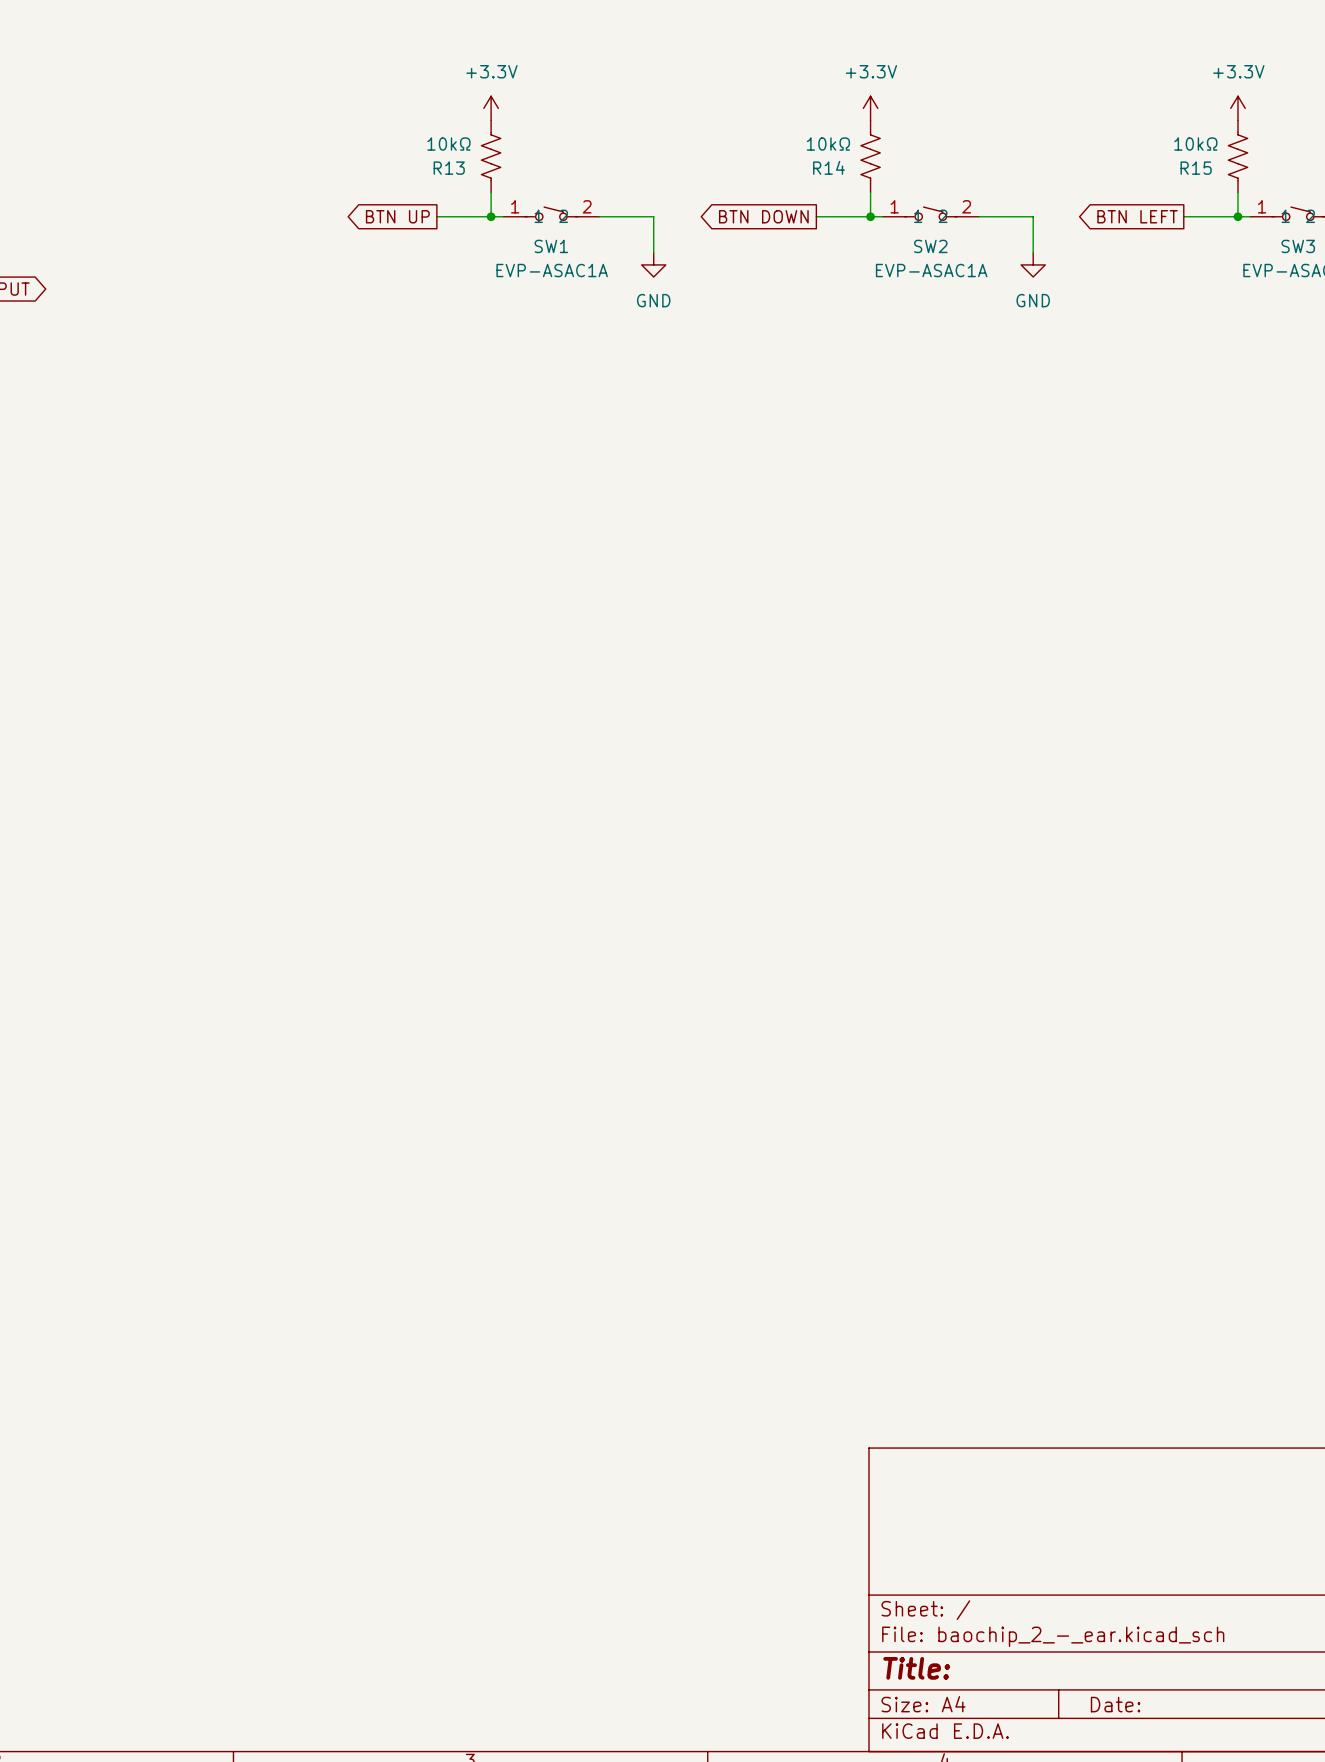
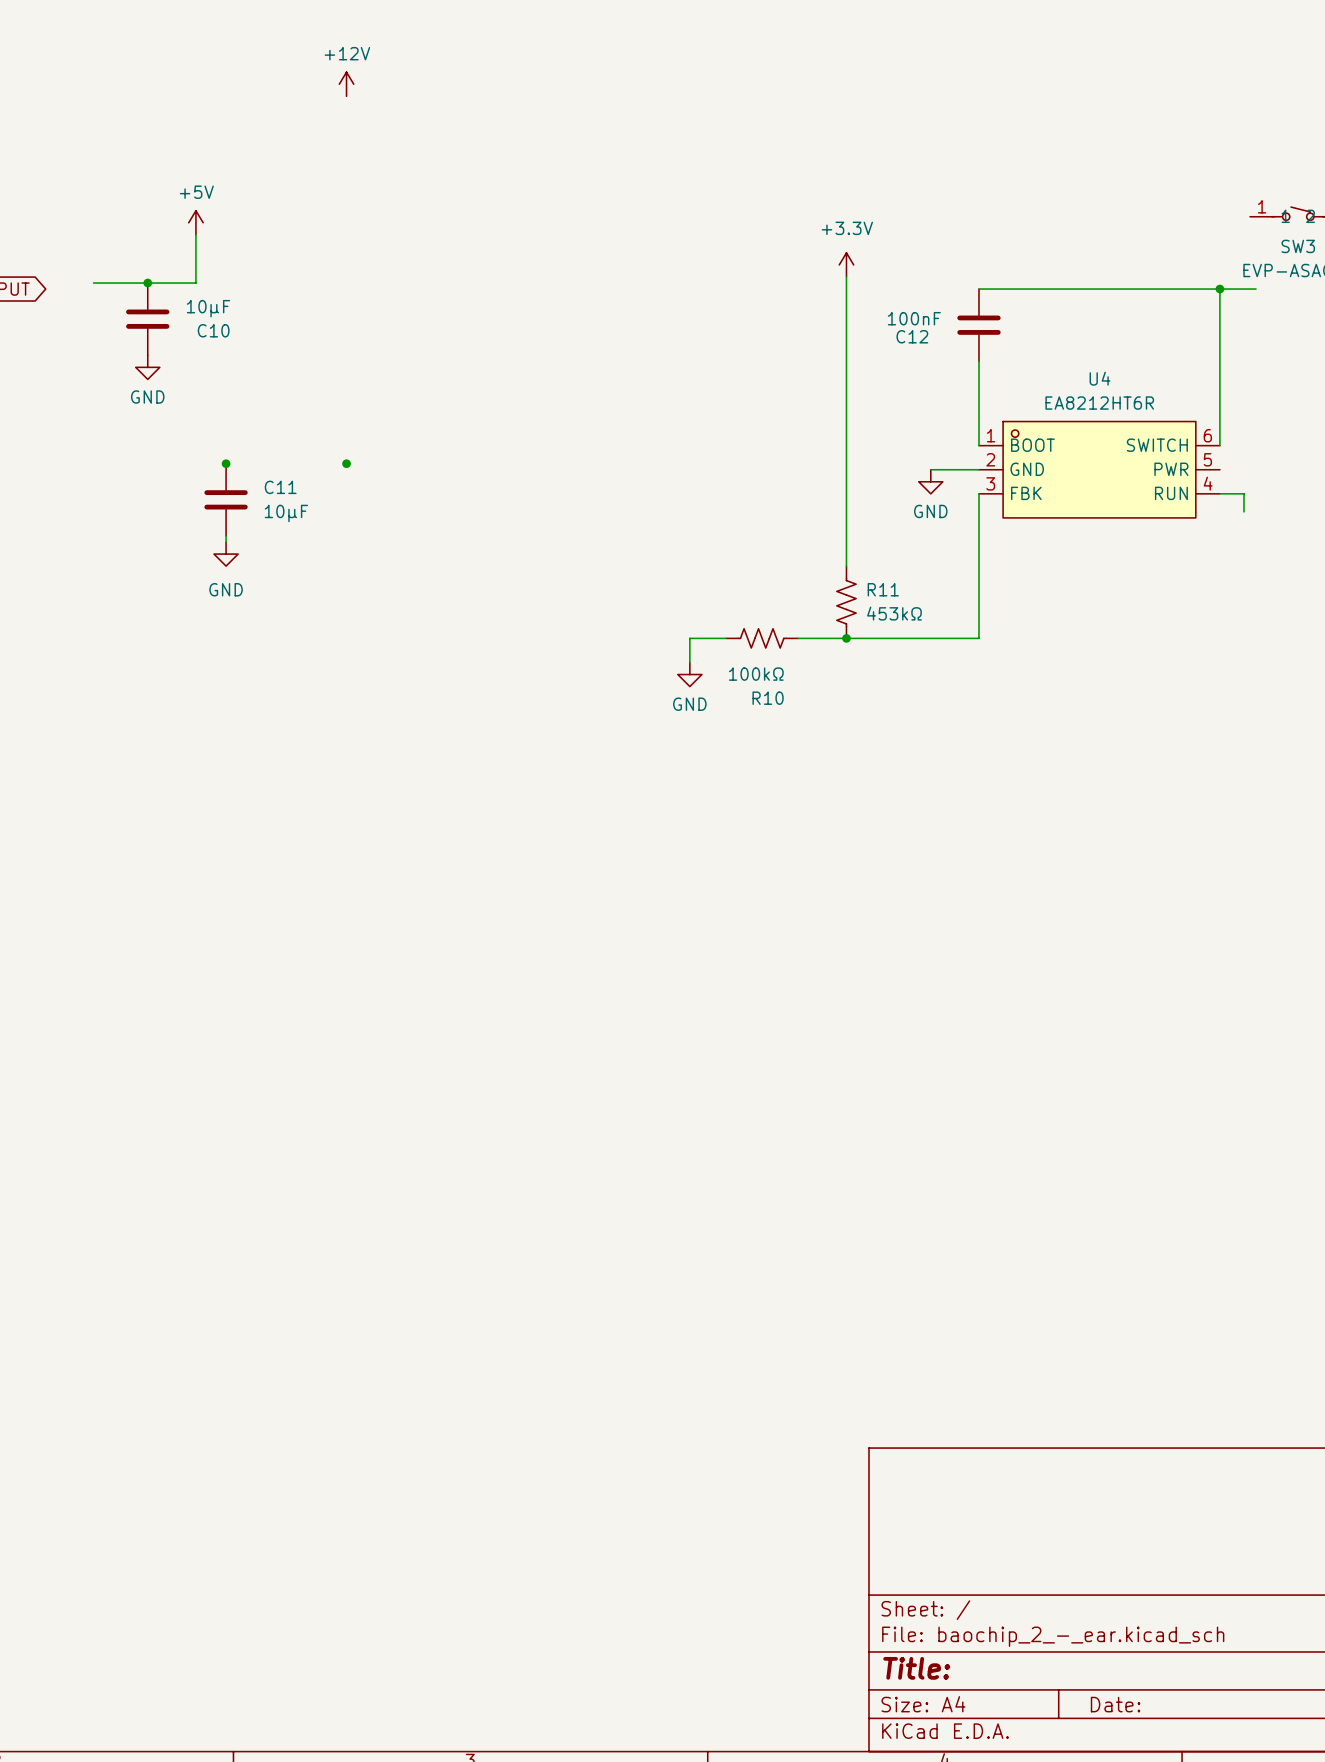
power symbol: none -> +12V (346, 84)
power symbol: +3.3V (491, 108) -> none
power symbol position: +3.3V (870, 108) -> +3.3V (846, 264)
power symbol: +3.3V (1237, 108) -> none
R13: 10kΩ (491, 156) -> none
R14: 10kΩ (870, 156) -> none
R15: 10kΩ (1237, 156) -> none
wire: (491, 192) (491, 216) -> none
wire: (870, 192) (870, 216) -> none
wire: (1237, 192) (1237, 216) -> none
SW1: EVP-ASAC1A (551, 213) -> none
SW2: EVP-ASAC1A (930, 213) -> none
global label: BTN UP (397, 216) -> none
wire: (436, 216) (503, 216) -> none
junction: (491, 216) -> none
wire: (599, 216) (653, 216) (653, 252) -> none
global label: BTN DOWN (763, 216) -> none
wire: (816, 216) (882, 216) -> none
junction: (870, 216) -> none
wire: (978, 216) (1033, 216) (1033, 252) -> none
global label: BTN LEFT (1137, 216) -> none
wire: (1183, 216) (1250, 216) -> none
junction: (1237, 216) -> none
power symbol: none -> +5V (195, 222)
wire: none -> (195, 234) (195, 283) (93, 283)
power symbol: GND (653, 264) -> none
power symbol: GND (1033, 264) -> none
wire: none -> (846, 276) (846, 566)
junction: none -> (147, 283)
wire: none -> (978, 289) (1256, 289)
wire: none -> (1219, 289) (1219, 445)
junction: none -> (1219, 289)
C10: none -> 10µF (147, 319)
C12: none -> 100nF (978, 325)
wire: none -> (978, 361) (978, 445)
power symbol: none -> GND (147, 367)
junction: none -> (226, 463)
junction: none -> (346, 463)
wire: none -> (930, 469) (978, 469)
U4: none -> EA8212HT6R (1099, 469)
power symbol: none -> GND (930, 481)
wire: none -> (978, 493) (978, 638) (798, 638)
wire: none -> (1219, 493) (1244, 493) (1244, 511)
C11: none -> 10µF (226, 499)
wire: none -> (226, 536) (226, 542)
power symbol: none -> GND (226, 554)
R11: none -> 453kΩ (846, 602)
wire: none -> (726, 638) (689, 638) (689, 662)
R10: none -> 100kΩ (762, 638)
junction: none -> (846, 638)
power symbol: none -> GND (689, 674)

